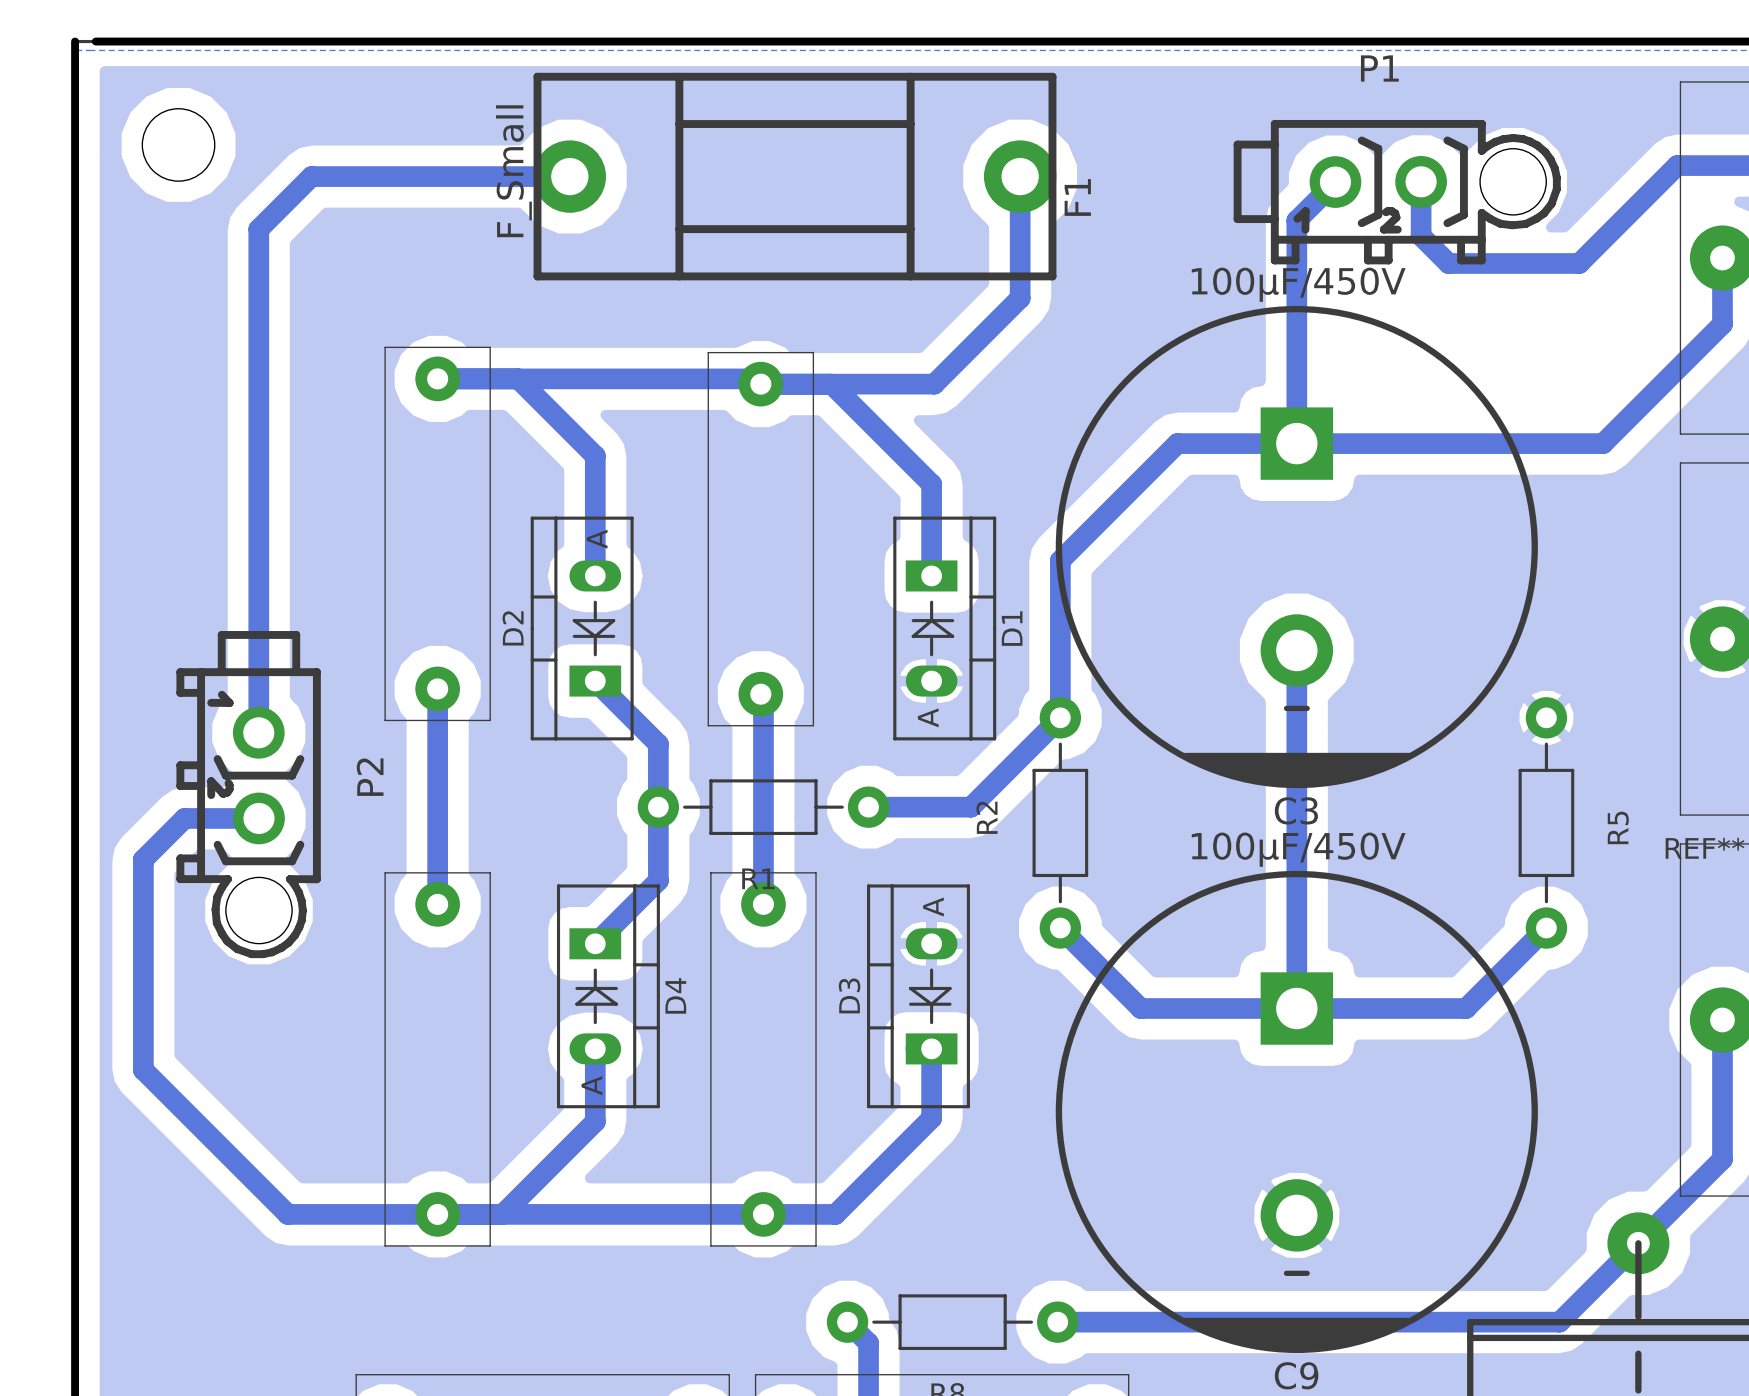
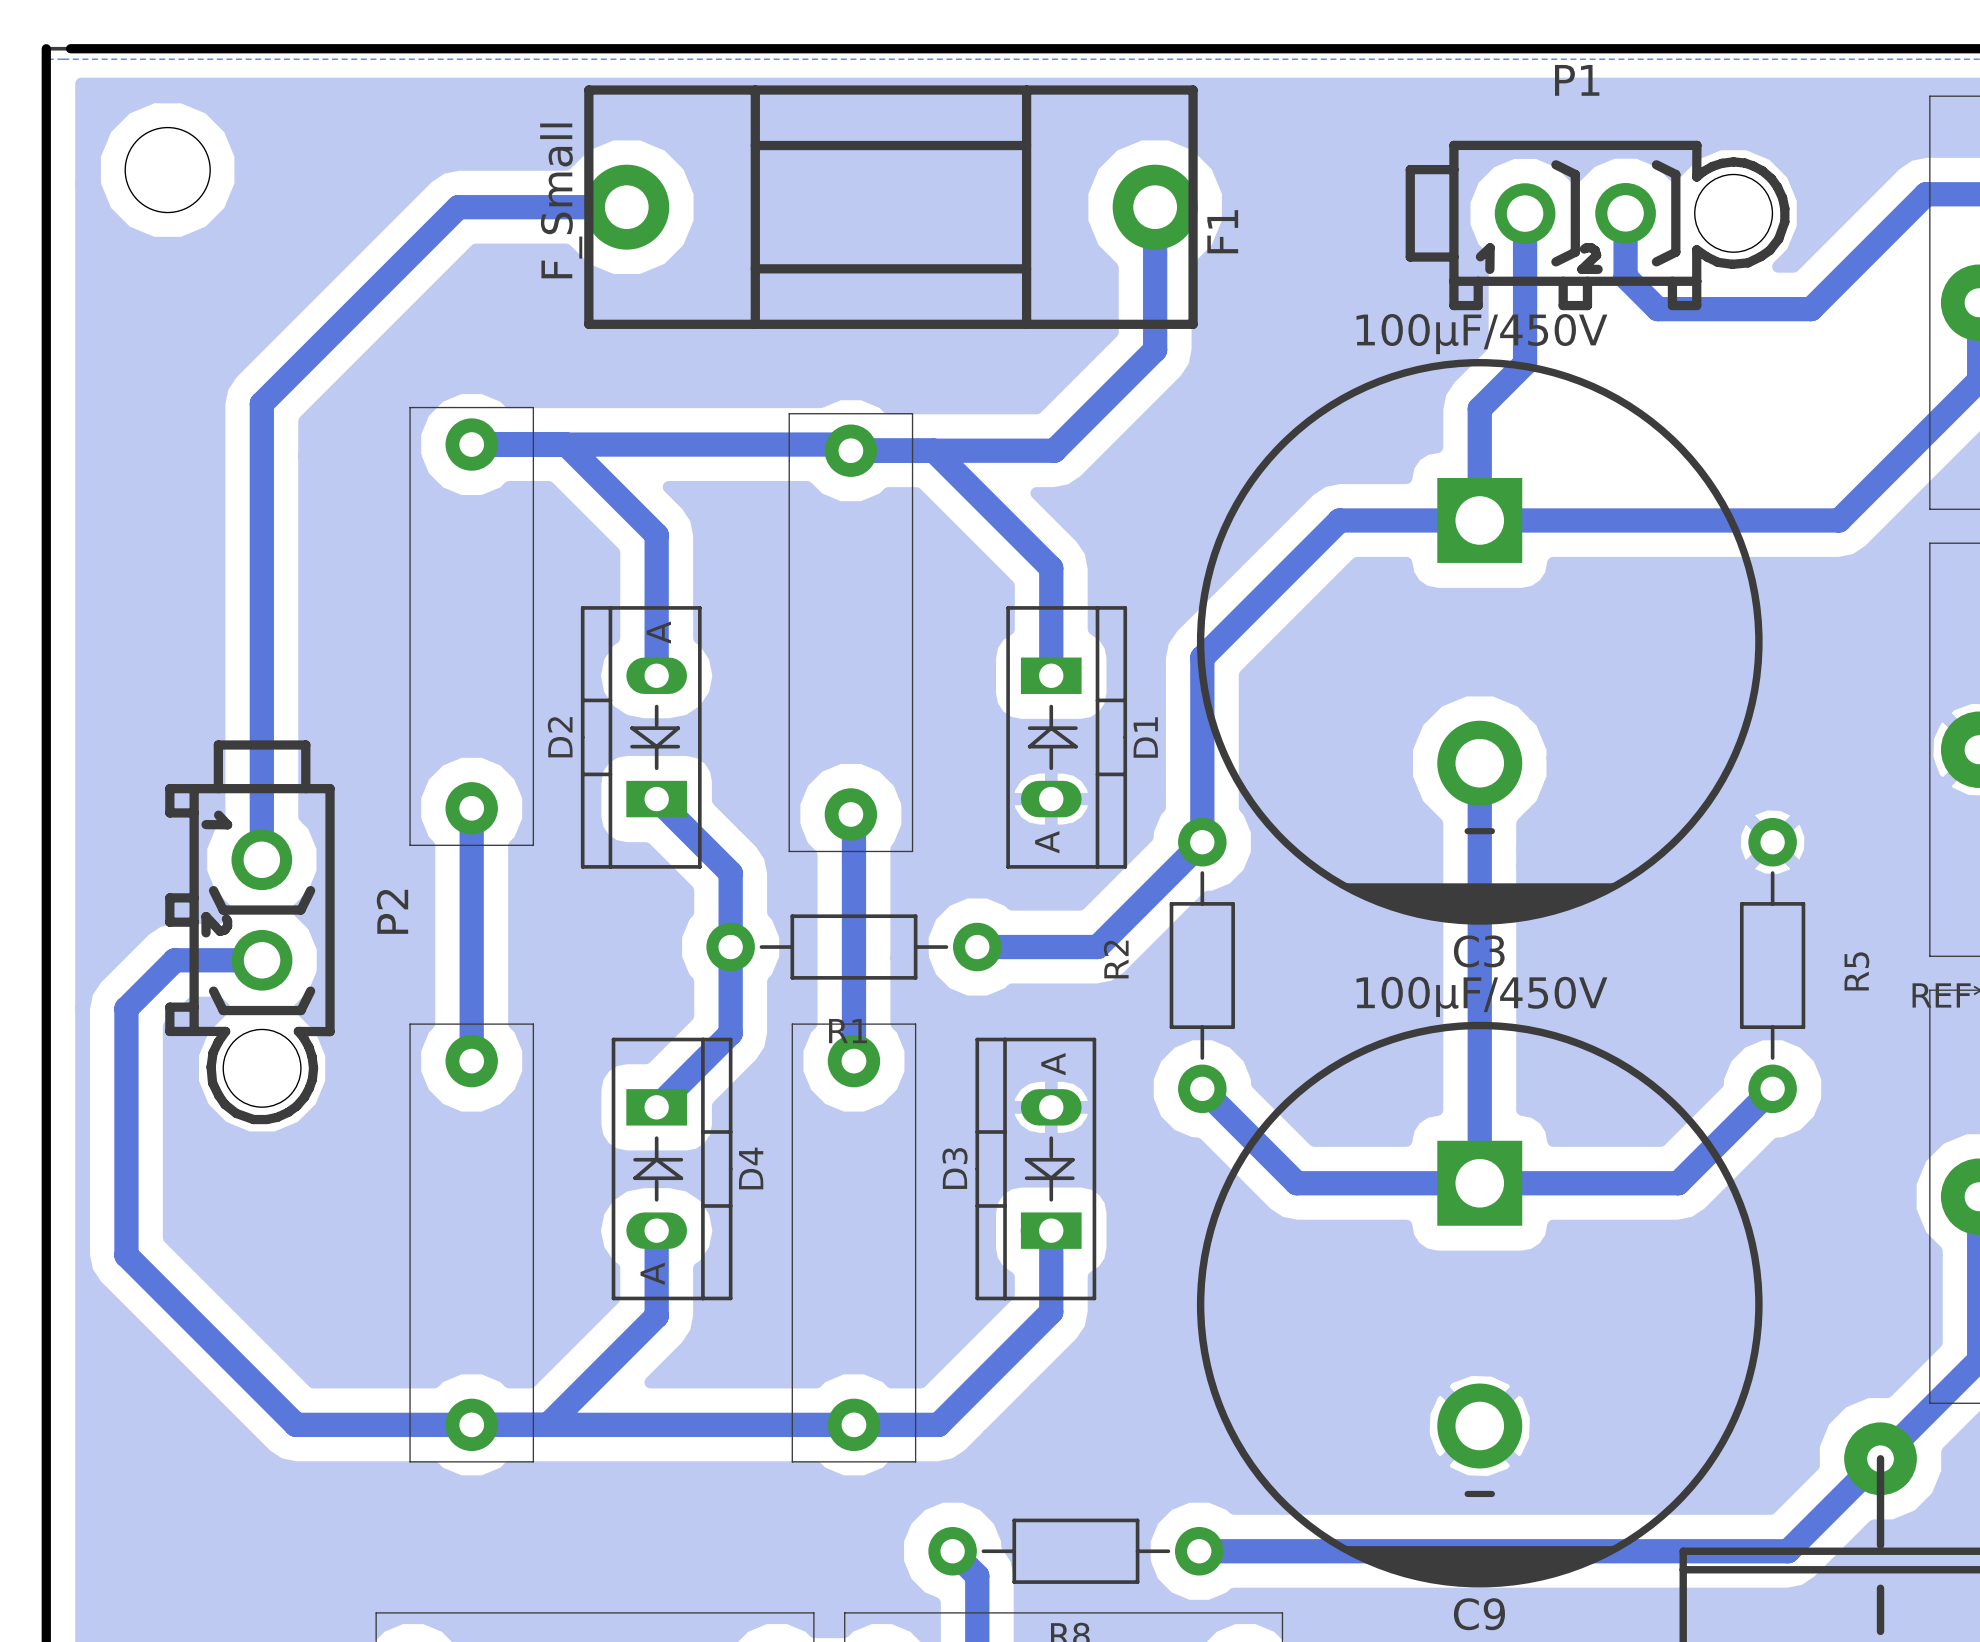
bottom track: (426, 176) (311, 176) (258, 229) (258, 344) -> (458, 207) (261, 403)
bottom track: (1335, 182) (1296, 220) (1296, 348) -> (1525, 213) (1525, 363) (1479, 408)

